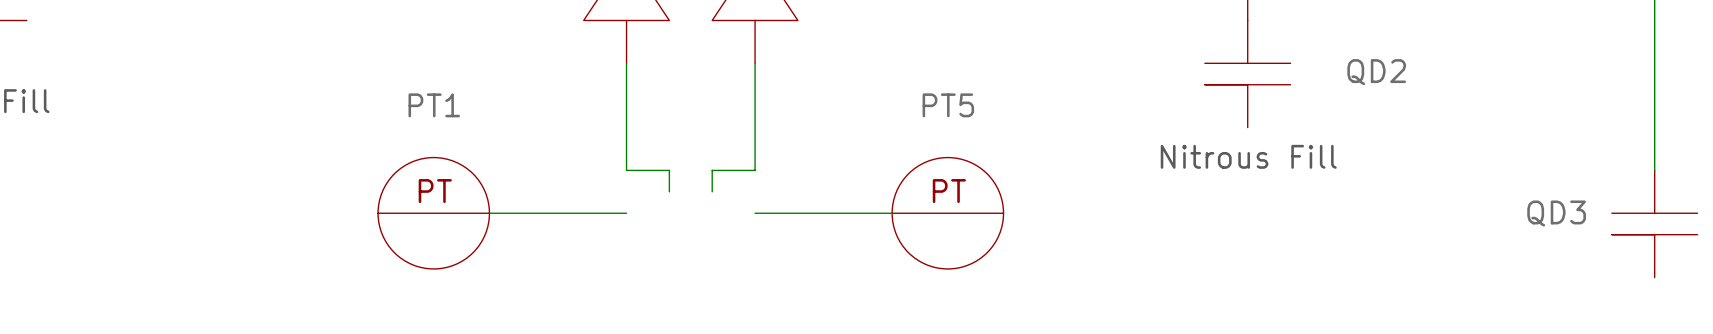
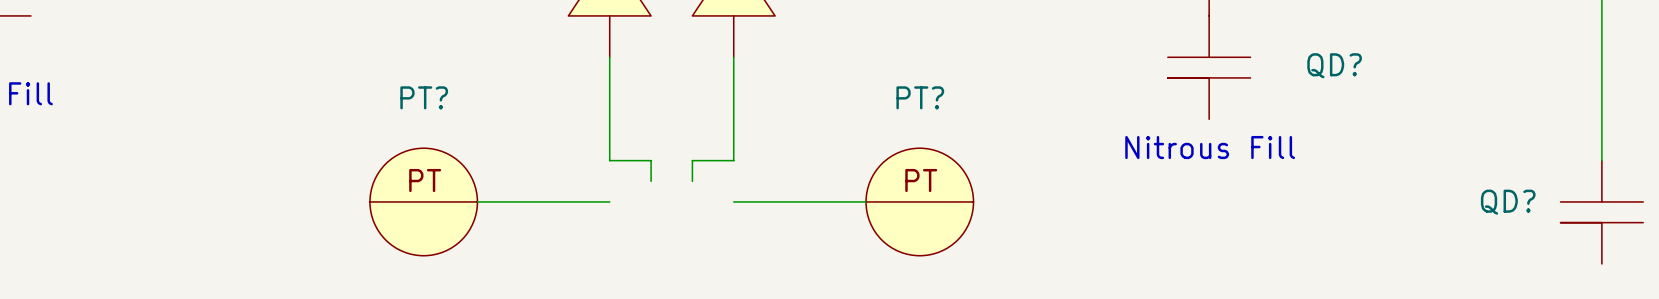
QD2 name: QD2 (1376, 72) -> QD? (1334, 65)
PT1 name: PT1 (434, 105) -> PT? (424, 97)
PT5 name: PT5 (948, 105) -> PT? (920, 97)
QD3 name: QD3 (1556, 213) -> QD? (1508, 202)

